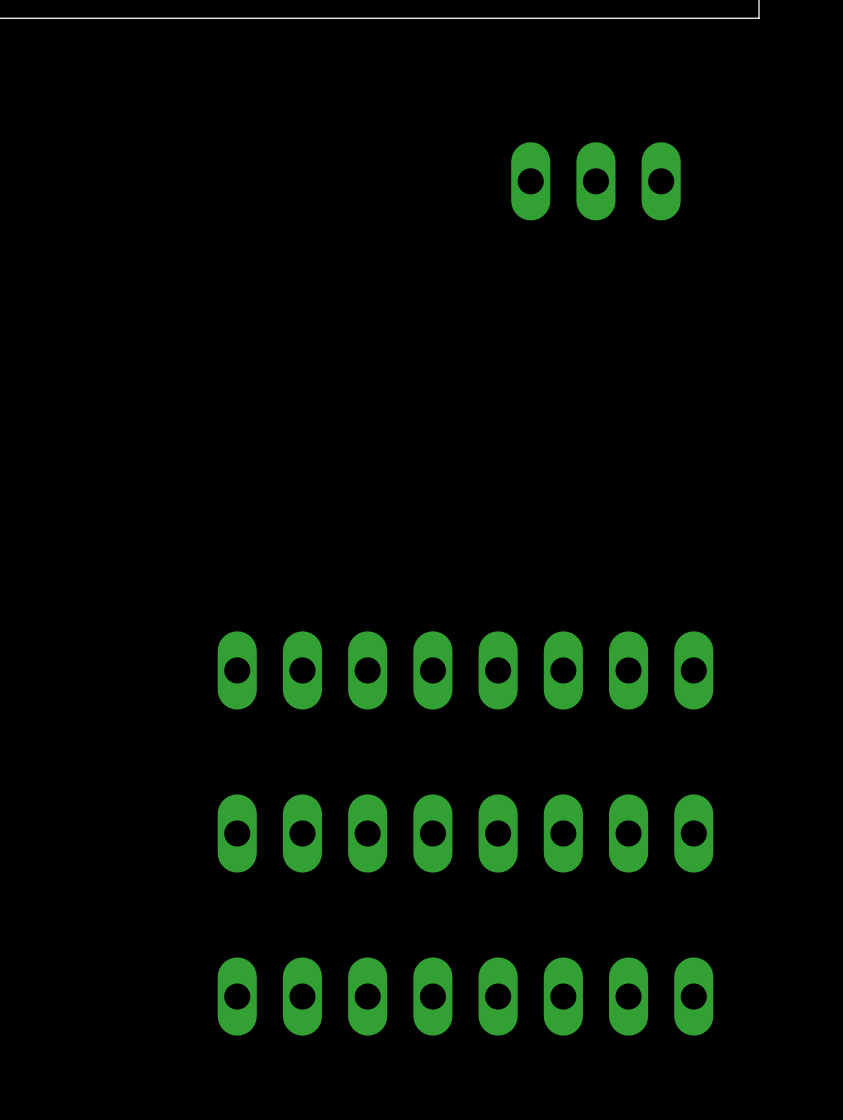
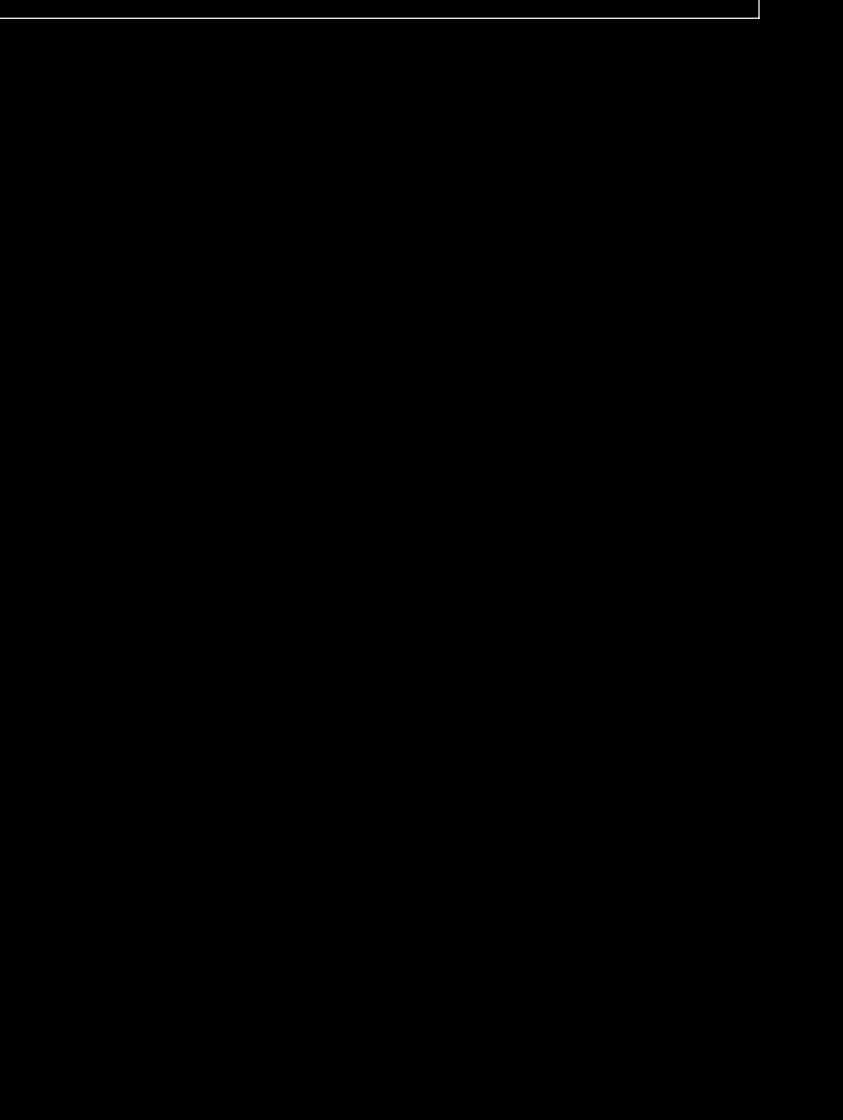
part: (595, 181) -> none
part: (465, 670) -> none
part: (465, 833) -> none
part: (465, 996) -> none

